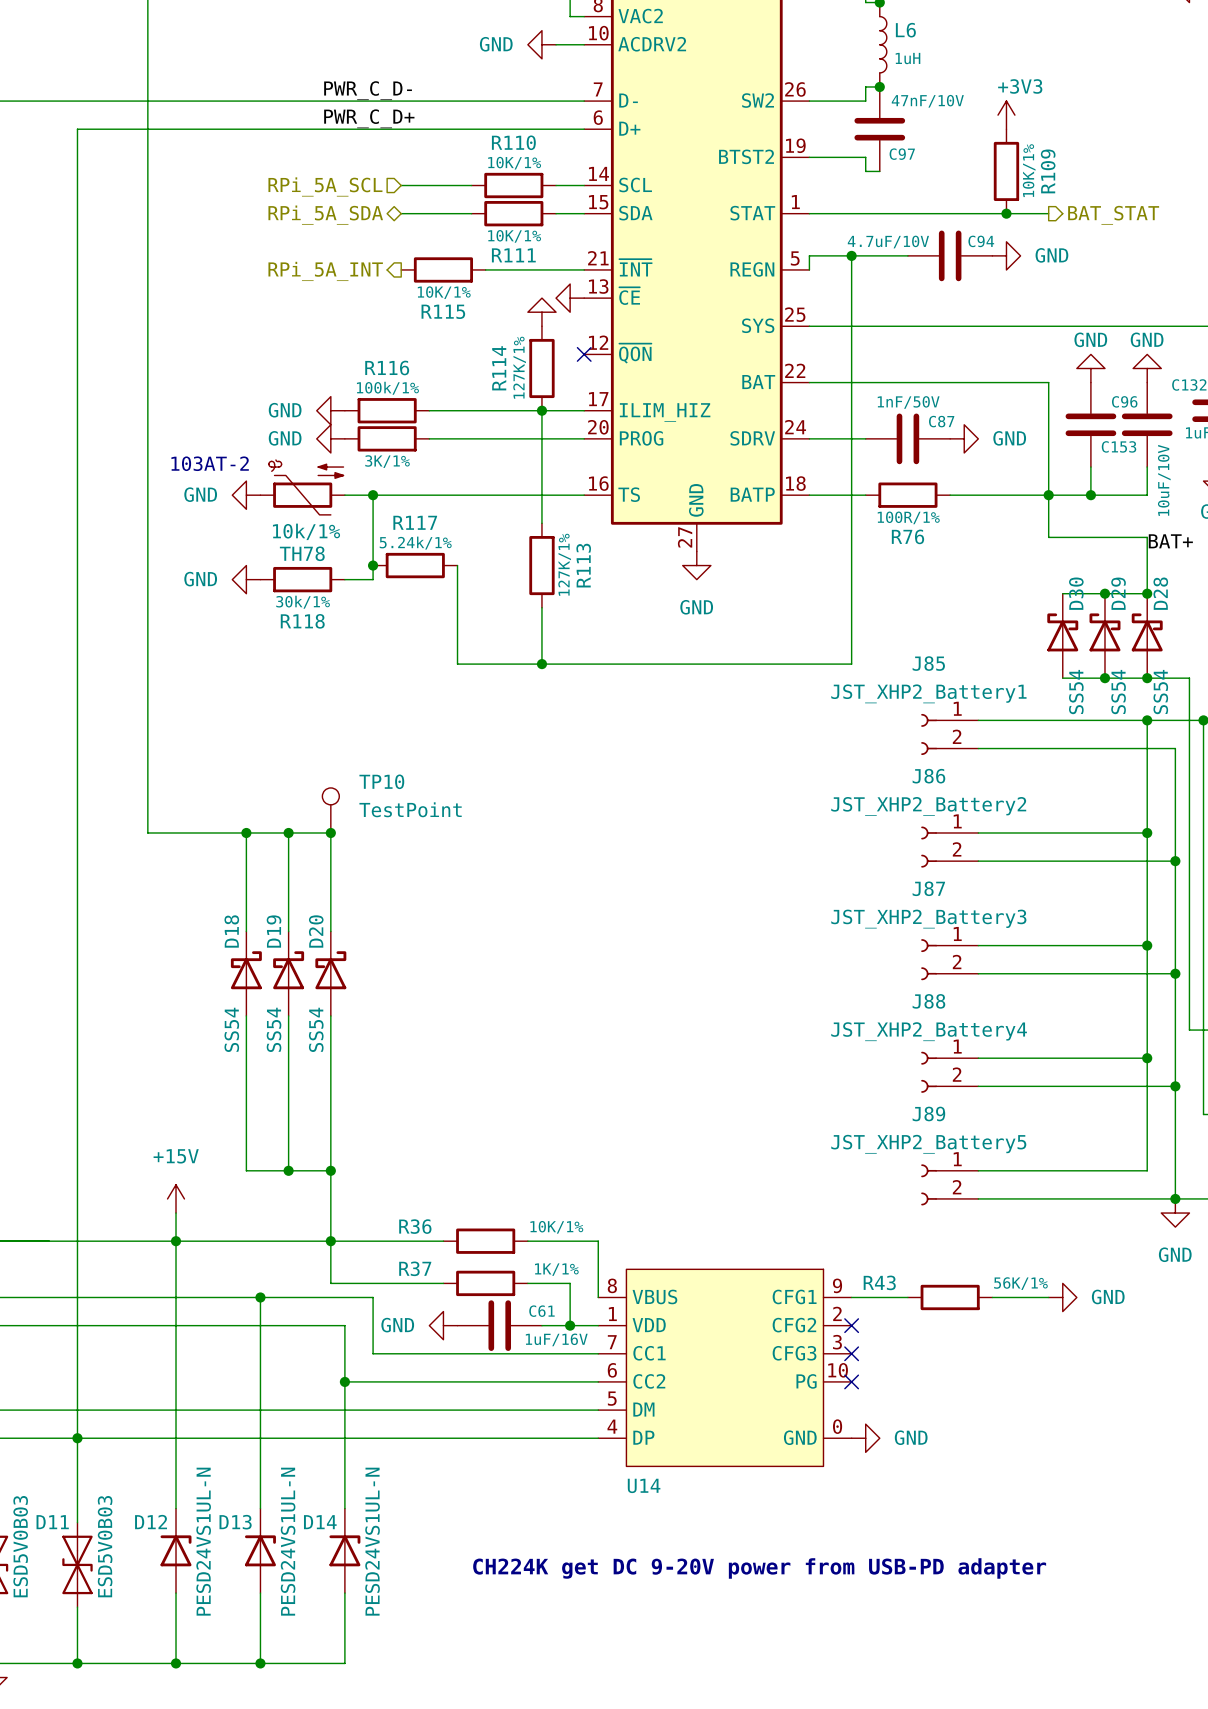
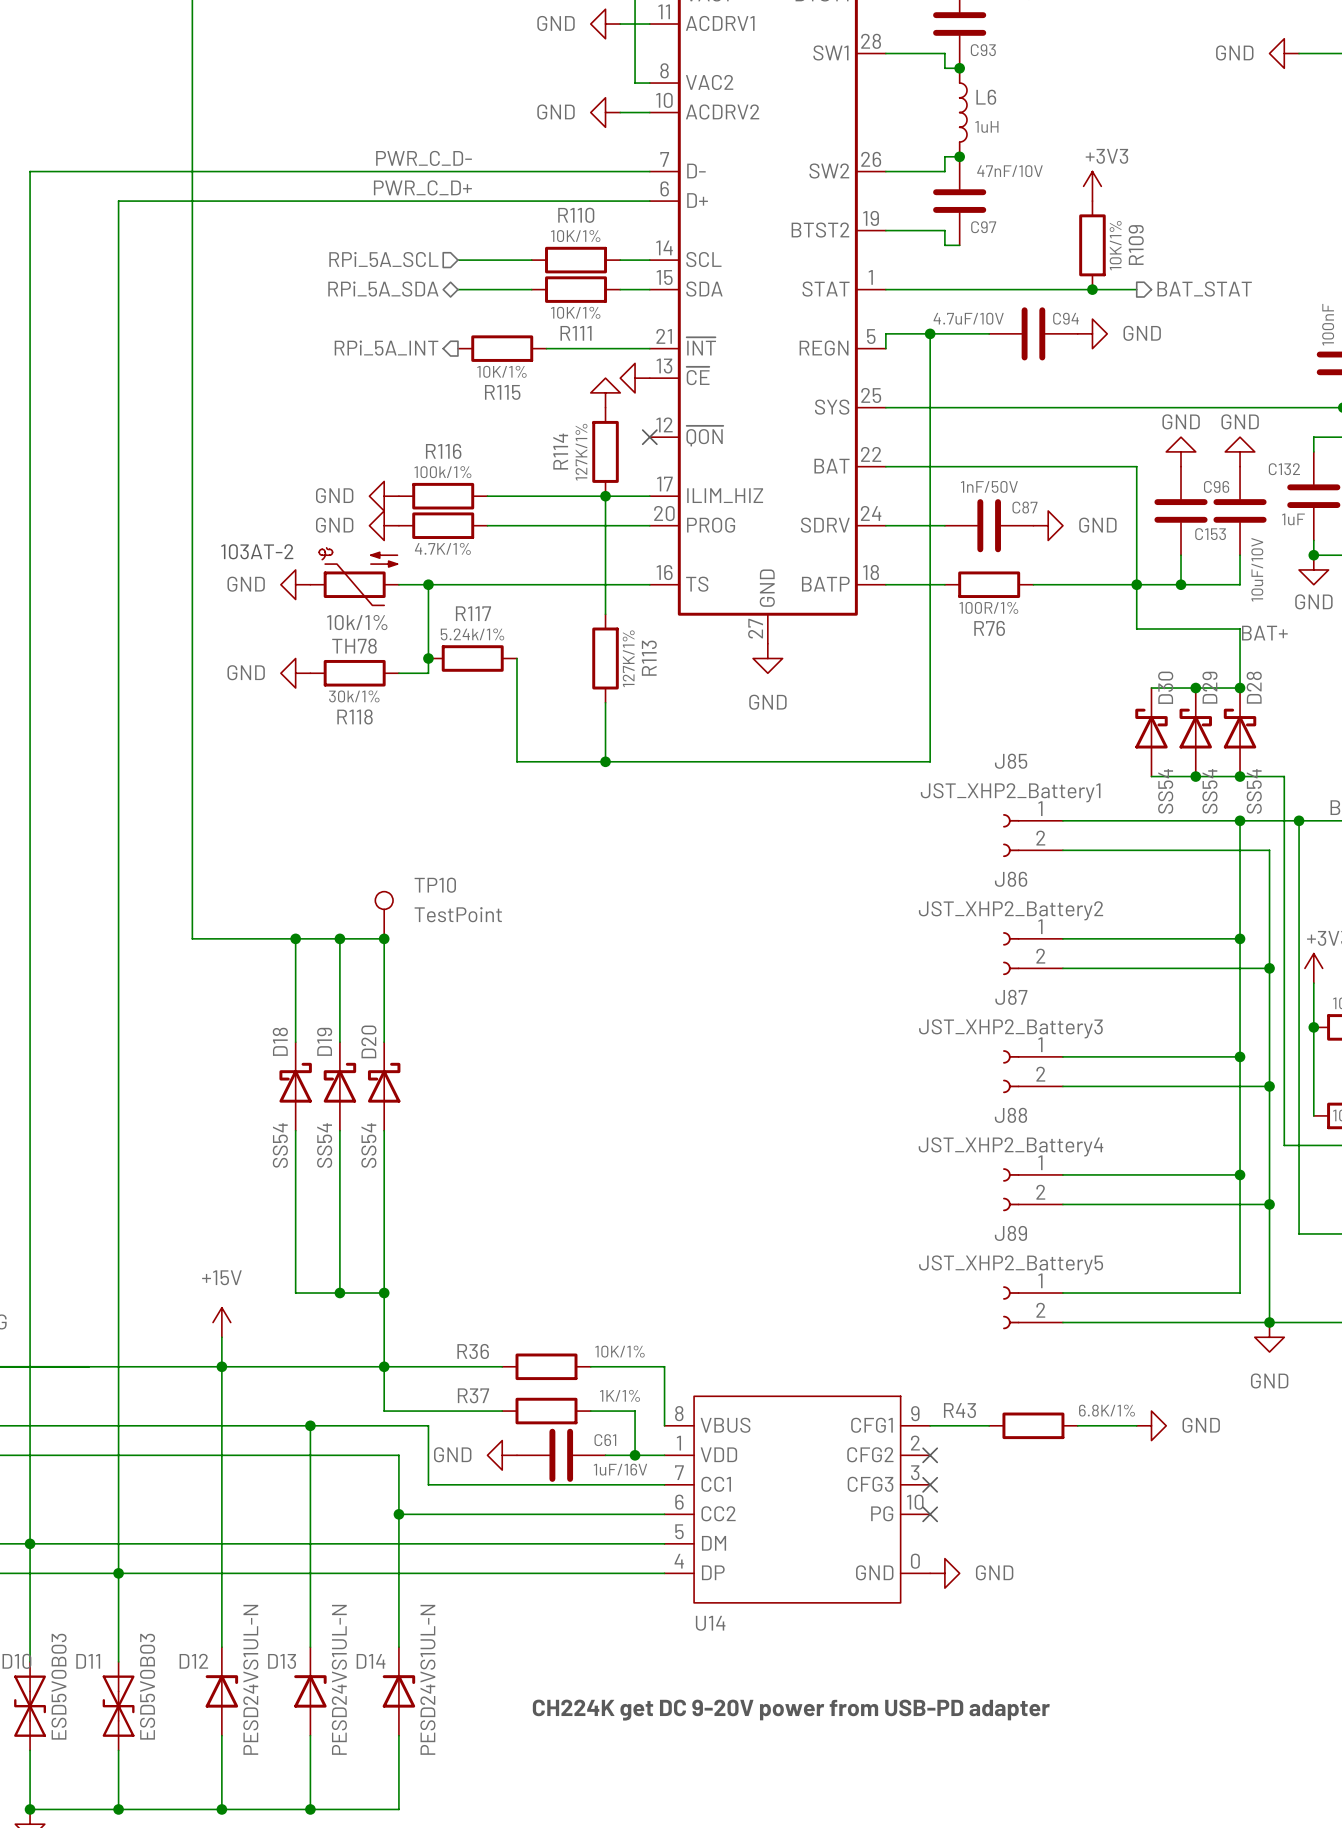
part value: 3K/1% (387, 461) -> 4.7K/1% (442, 548)
R43 value: 56K/1% (1020, 1283) -> 6.8K/1% (1106, 1410)

